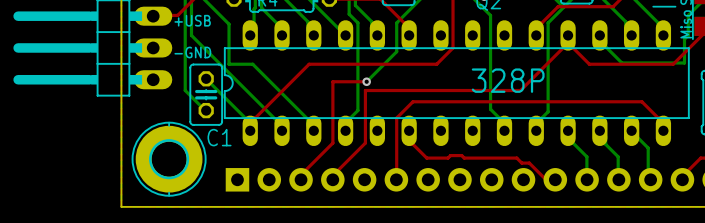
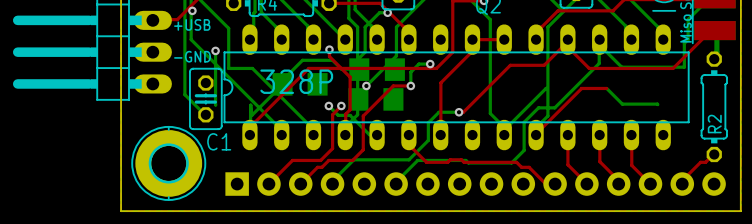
via: none -> (192, 10)
via: none -> (387, 12)
top track: none -> (504, 39) (472, 39) (472, 51) (440, 82) (440, 135)
top track: (568, 35) (566, 46) (564, 46) (520, 90) (365, 90) (365, 143) (337, 170) (332, 170) (332, 179) -> (567, 39) (544, 65) (510, 65) (463, 112) (459, 112)
bottom track: none -> (599, 39) (599, 63) (554, 107) (538, 107) (524, 122) (524, 150) (511, 162) (417, 160) (396, 184)
top track: none -> (329, 49) (329, 56) (350, 77) (350, 109) (345, 114) (345, 135)
via: none -> (329, 49)
bottom track: none -> (215, 50) (215, 105)
via: none -> (215, 50)
bottom track: none -> (430, 64) (418, 64) (410, 72) (410, 85)
via: none -> (430, 64)
part: none -> (377, 69)
bottom track: (206, 78) (249, 121) (250, 130) -> (387, 12) (379, 12) (365, 27) (365, 52) (359, 57) (359, 69) (341, 69) (332, 60) (302, 60) (283, 79) (282, 84) (251, 115) (250, 105) (249, 135)
part: none -> (300, 84)
328P name position: 328P (508, 80) -> 328P (296, 81)
top track: (366, 81) (332, 81) (332, 110) -> (341, 105) (332, 114)
top track: none -> (410, 85) (393, 85) (363, 116) (363, 149) (352, 160) (328, 160) (321, 167) (317, 167) (301, 183)
via: none -> (410, 85)
bottom track: none -> (546, 88) (505, 129) (504, 135)
bottom track: none -> (606, 88) (622, 104) (657, 104)
top track: none -> (606, 88) (581, 88) (536, 135)
part: none -> (375, 99)
bottom track: none -> (328, 105) (338, 115) (350, 115) (369, 134) (377, 135)
via: none -> (328, 105)
via: none -> (341, 105)
bottom track: none -> (459, 112) (439, 112) (428, 122) (428, 140) (408, 159) (353, 159) (332, 181) (332, 184)
via: none -> (459, 112)
bottom track: (568, 130) (573, 136) (573, 143) (586, 156) (587, 179) -> none
top track: none -> (567, 135) (567, 164) (586, 184)
bottom track: (599, 130) (605, 136) (605, 144) (618, 156) (618, 179) -> none
top track: none -> (599, 135) (599, 161) (618, 180) (618, 184)
bottom track: (631, 130) (648, 148) (648, 178) (650, 179) -> none
top track: none -> (631, 135) (631, 165) (650, 184)
top track: (663, 130) (663, 118) (658, 118) (641, 101) (412, 101) (396, 118) (396, 179) -> none
top track: (332, 143) (305, 170) (301, 170) (301, 179) -> (332, 147) (320, 160) (292, 160) (268, 184)

